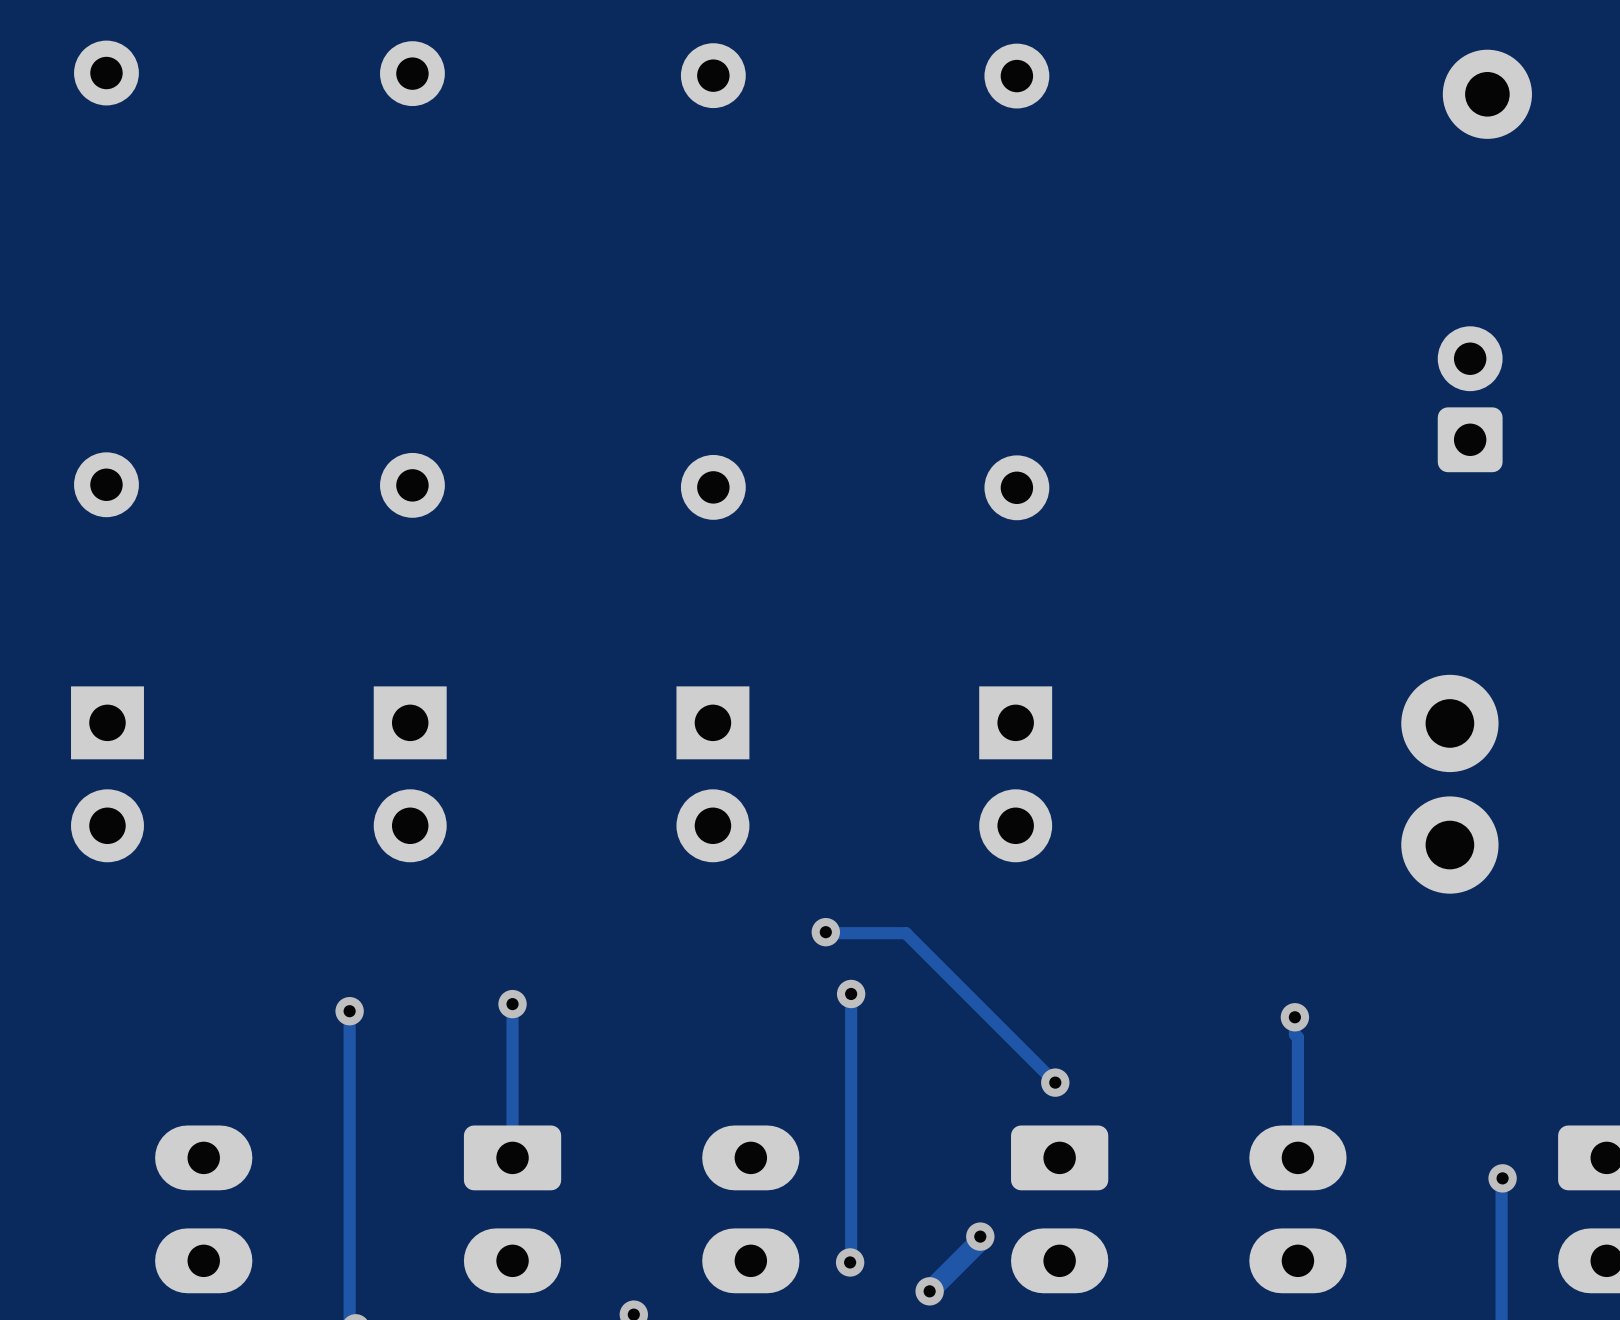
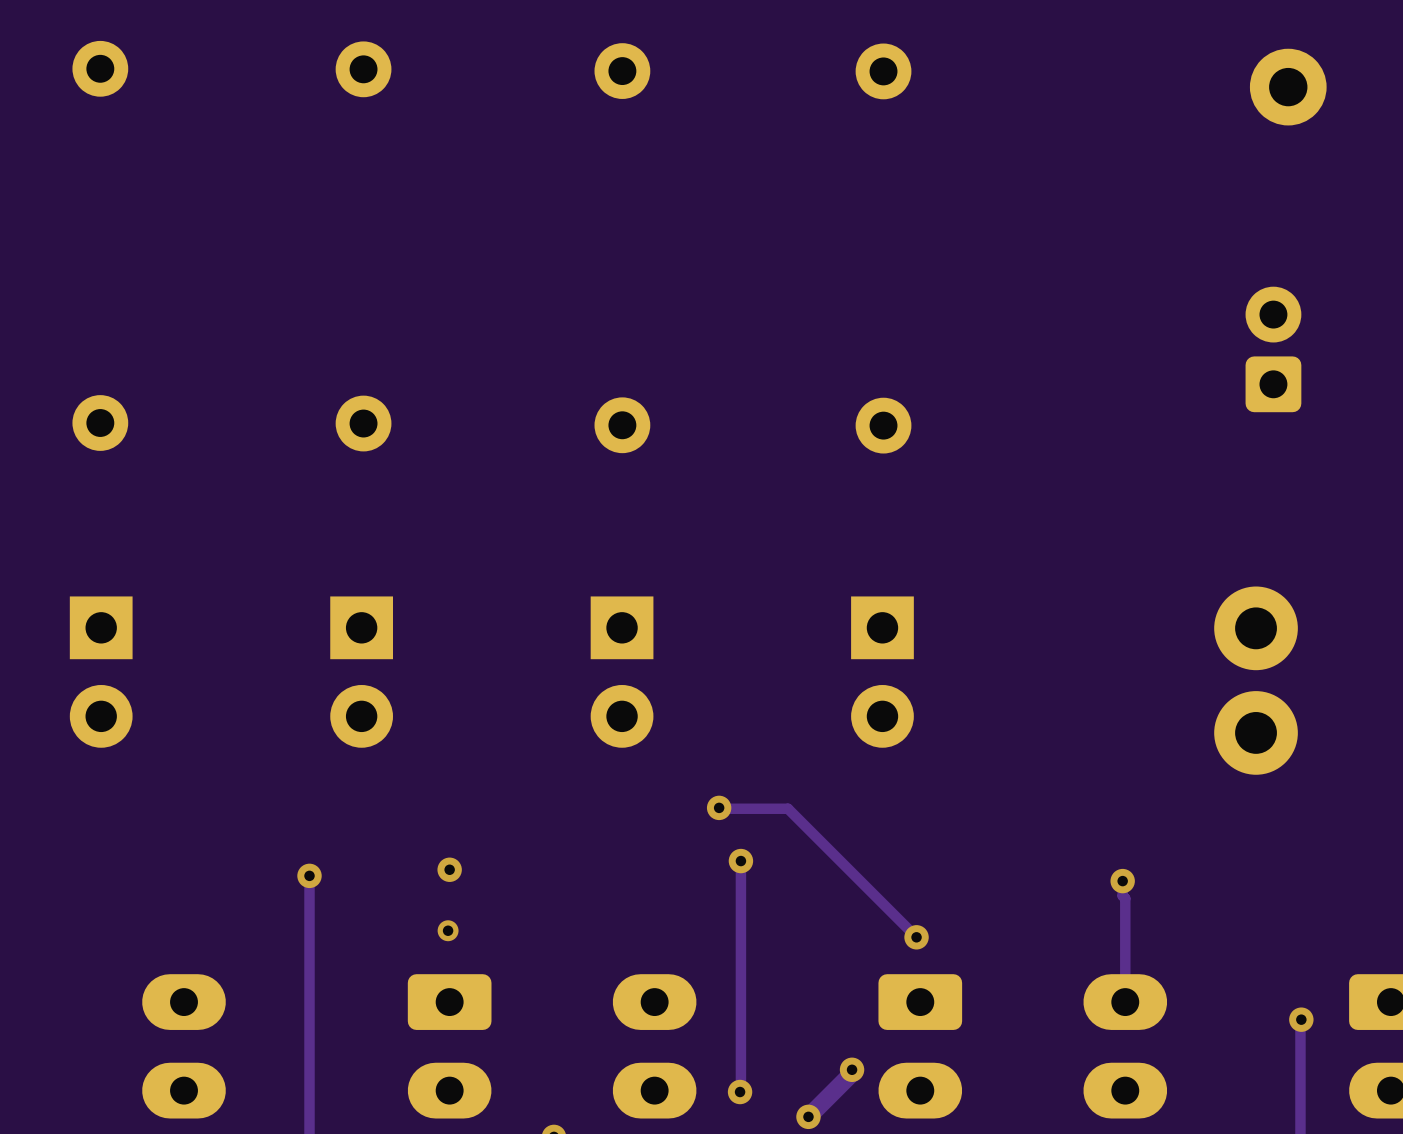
track: (510, 1002) (512, 1003) (512, 1157) -> none
via: none -> (448, 930)

